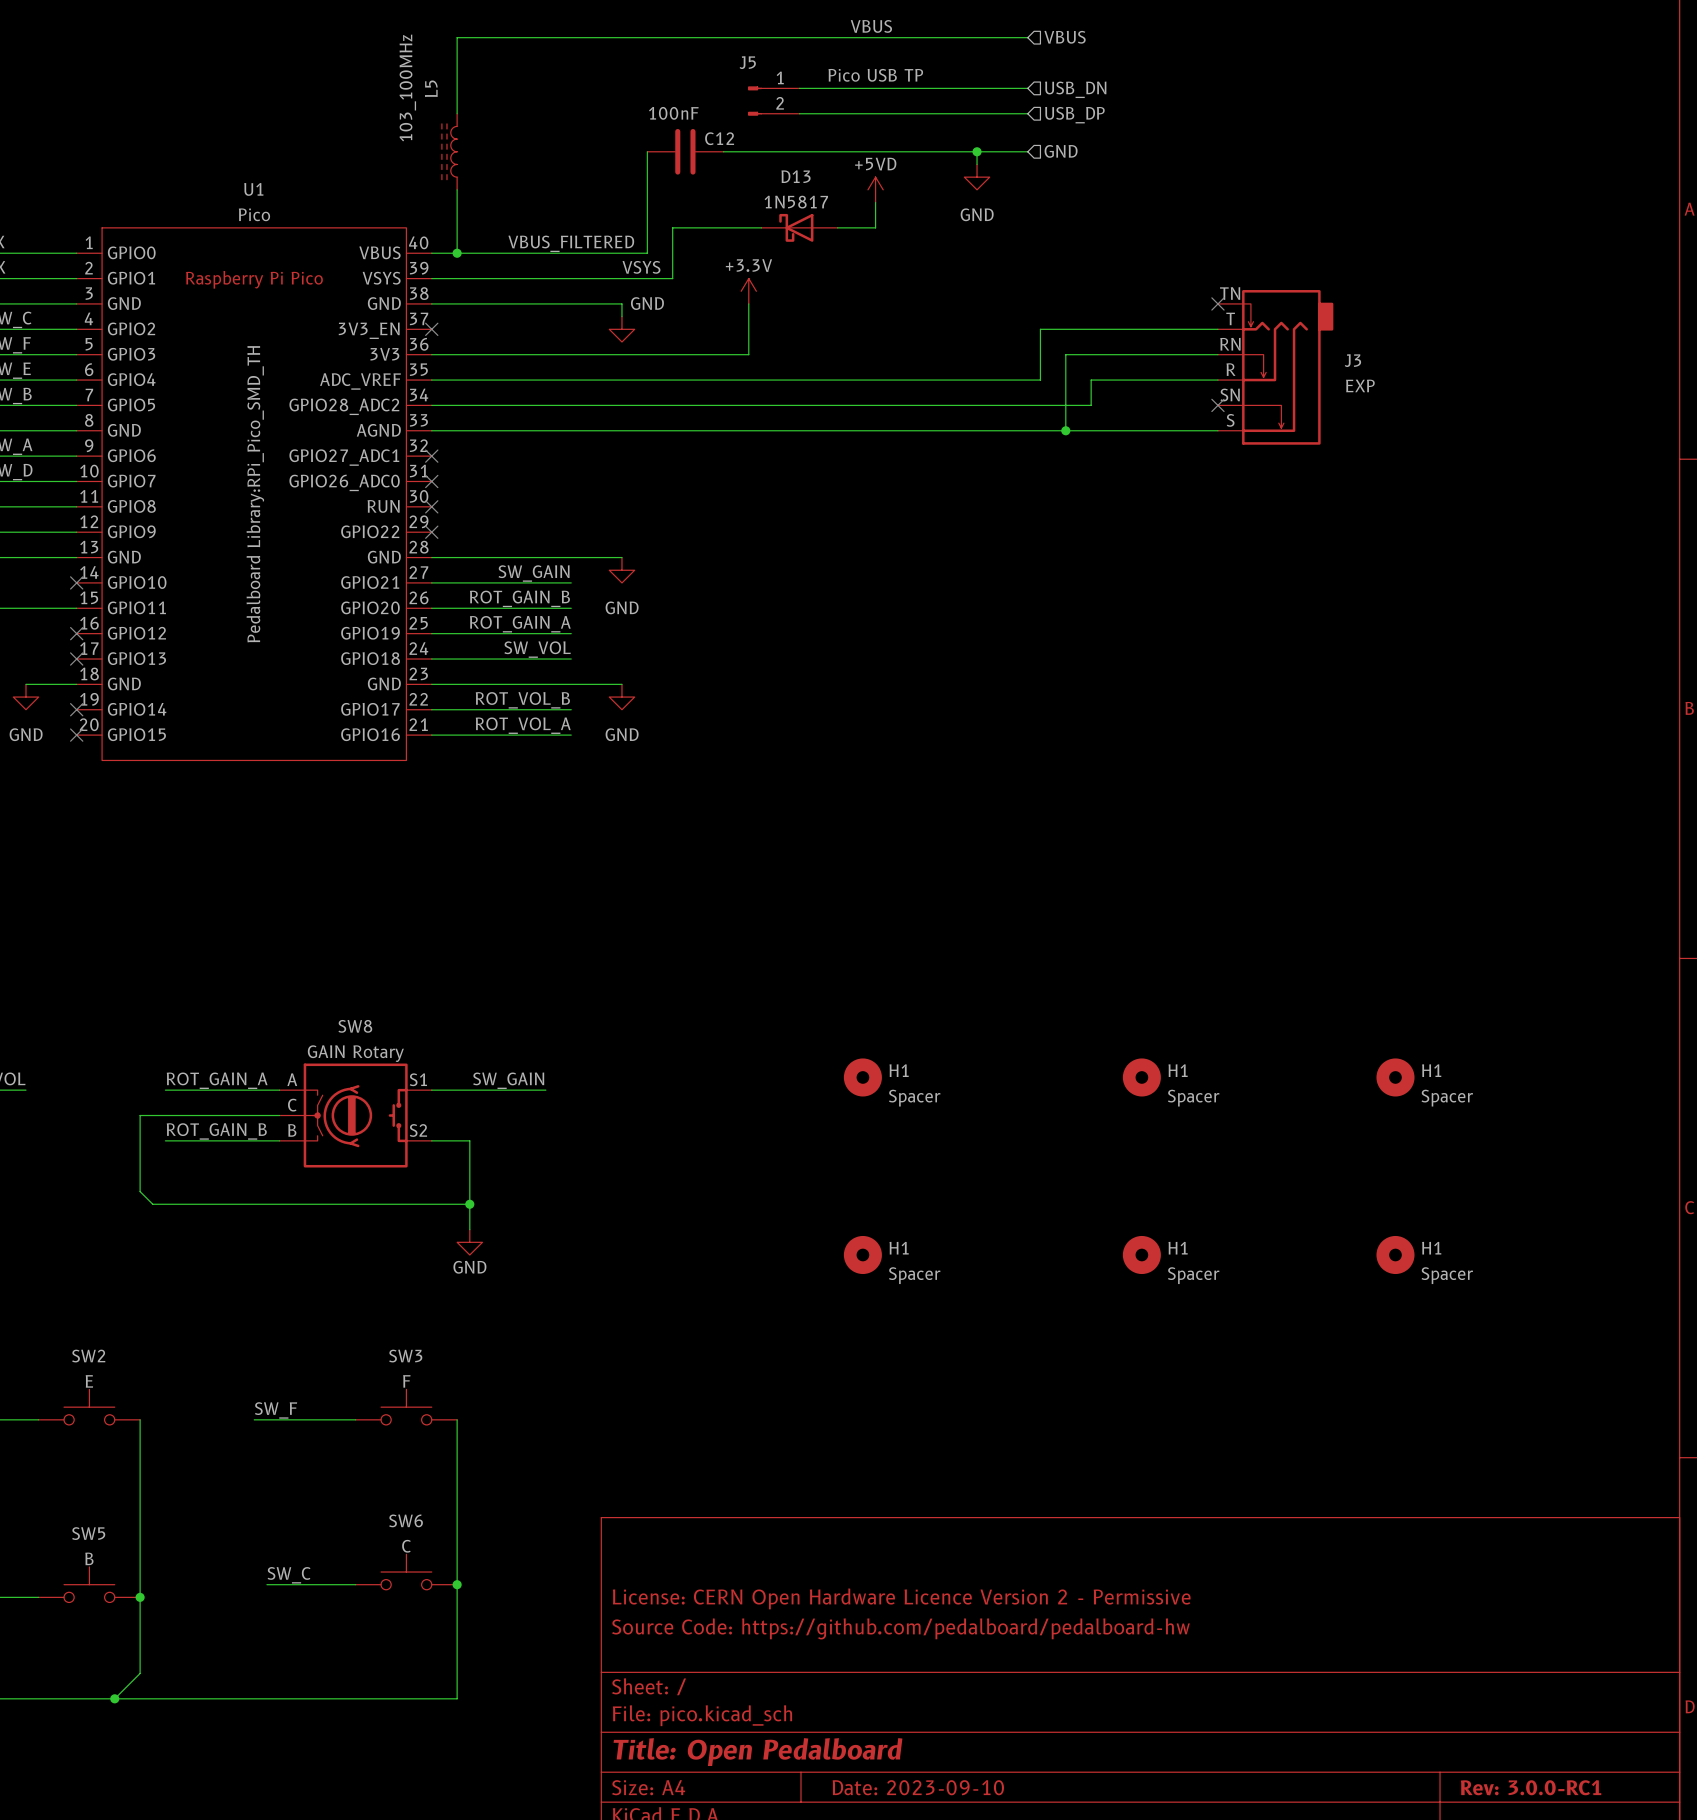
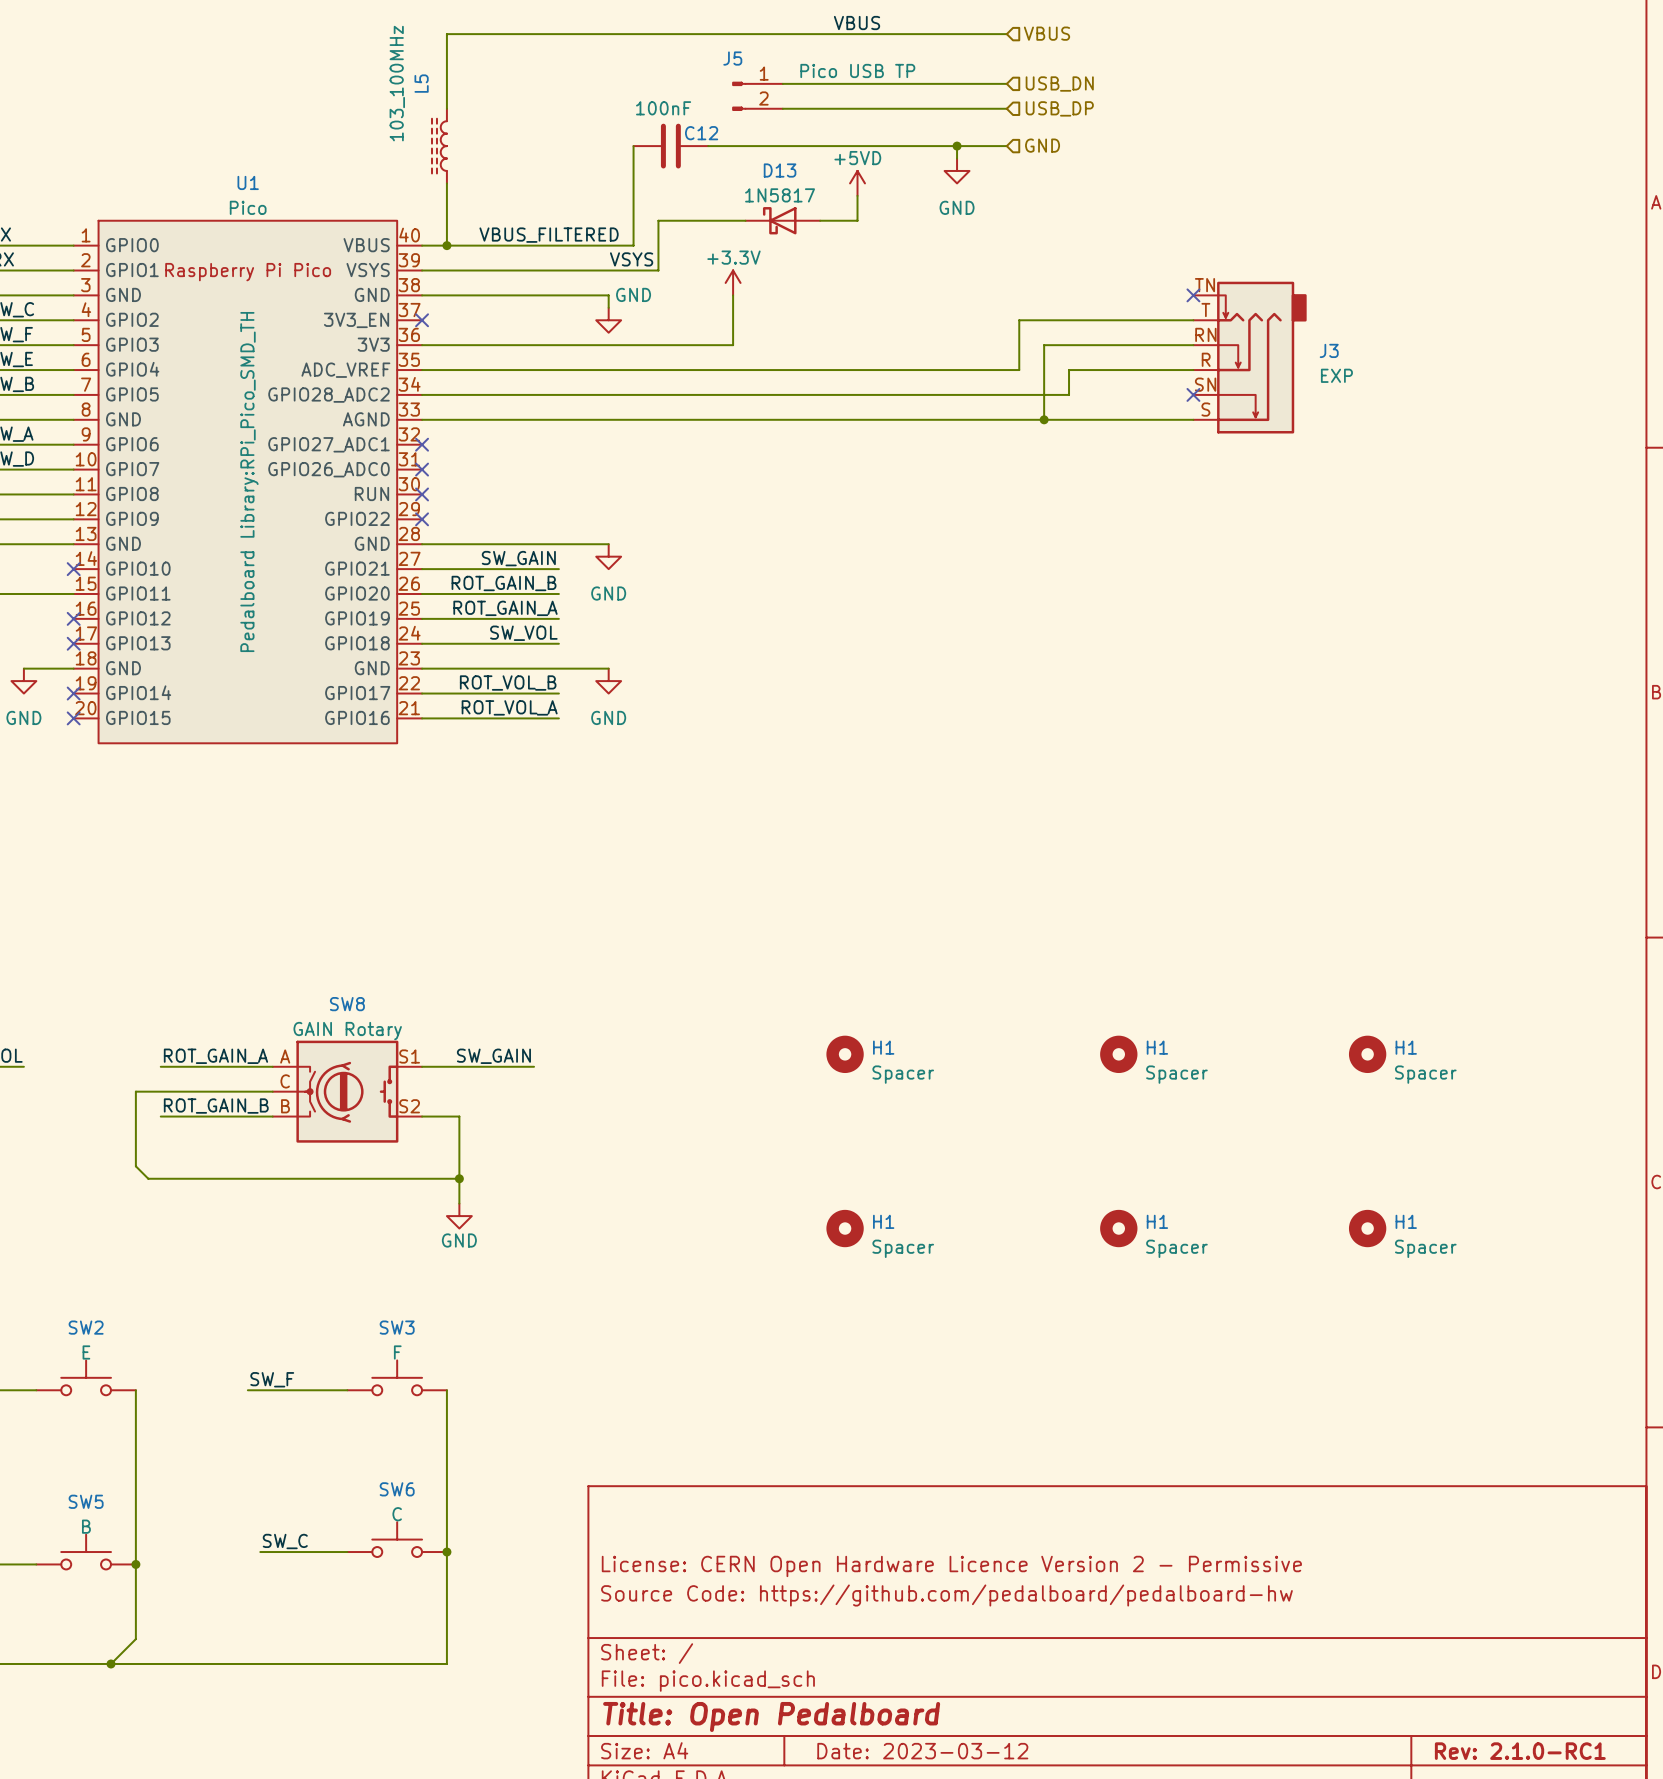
title block: Date: 2023-09-10 (918, 1787) -> Date: 2023-03-12 (922, 1751)
title block: Rev: 3.0.0-RC1 (1531, 1787) -> Rev: 2.1.0-RC1 (1520, 1751)

